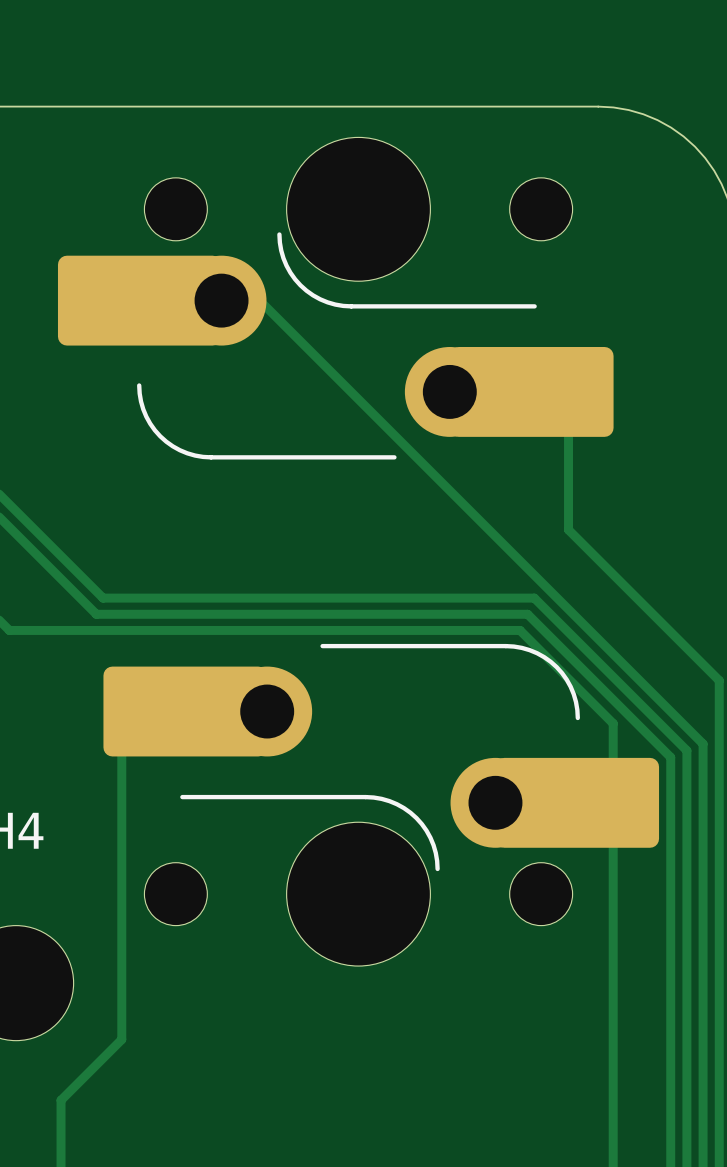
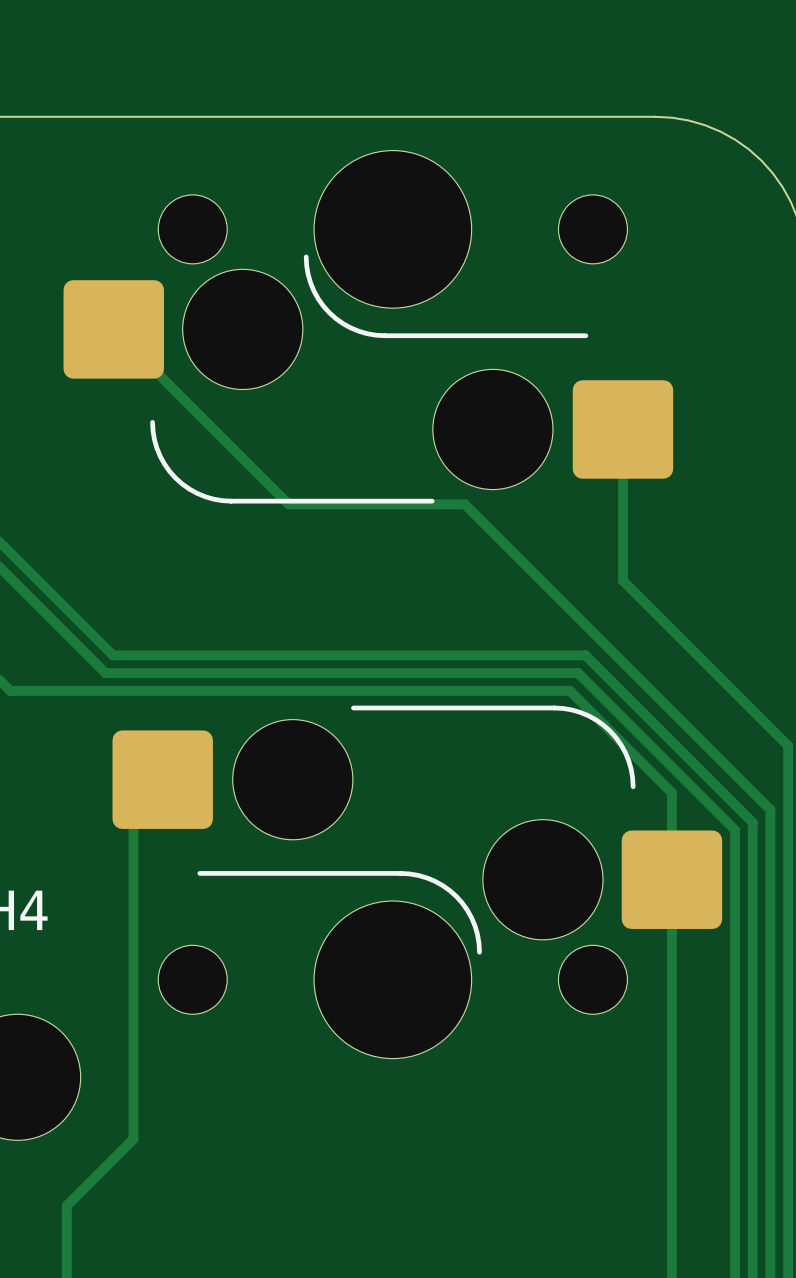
part footprint: [57, 137, 614, 460] -> [63, 150, 674, 504]
track: (103, 300) (259, 300) (703, 743) -> (113, 329) (288, 504) (464, 504) (770, 809) (770, 815)
part footprint: [103, 643, 660, 967] -> [112, 705, 723, 1059]

